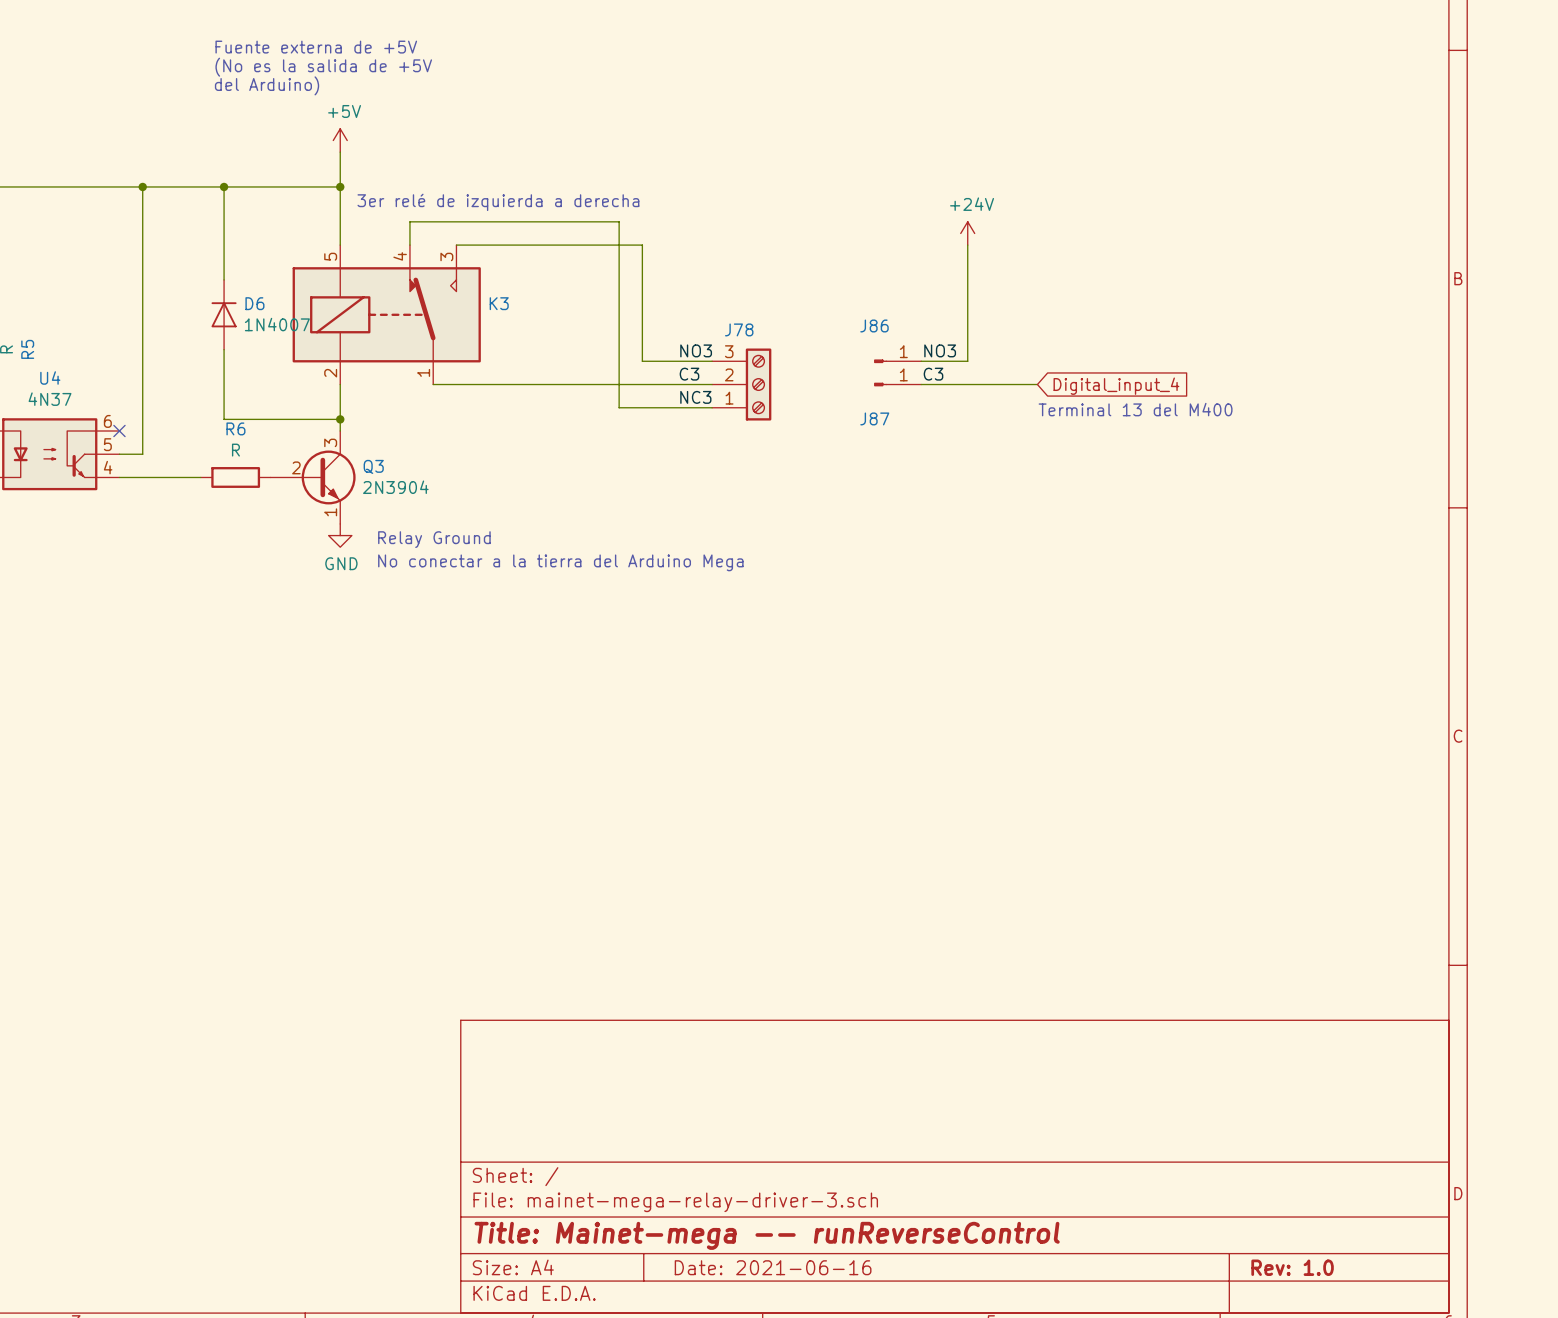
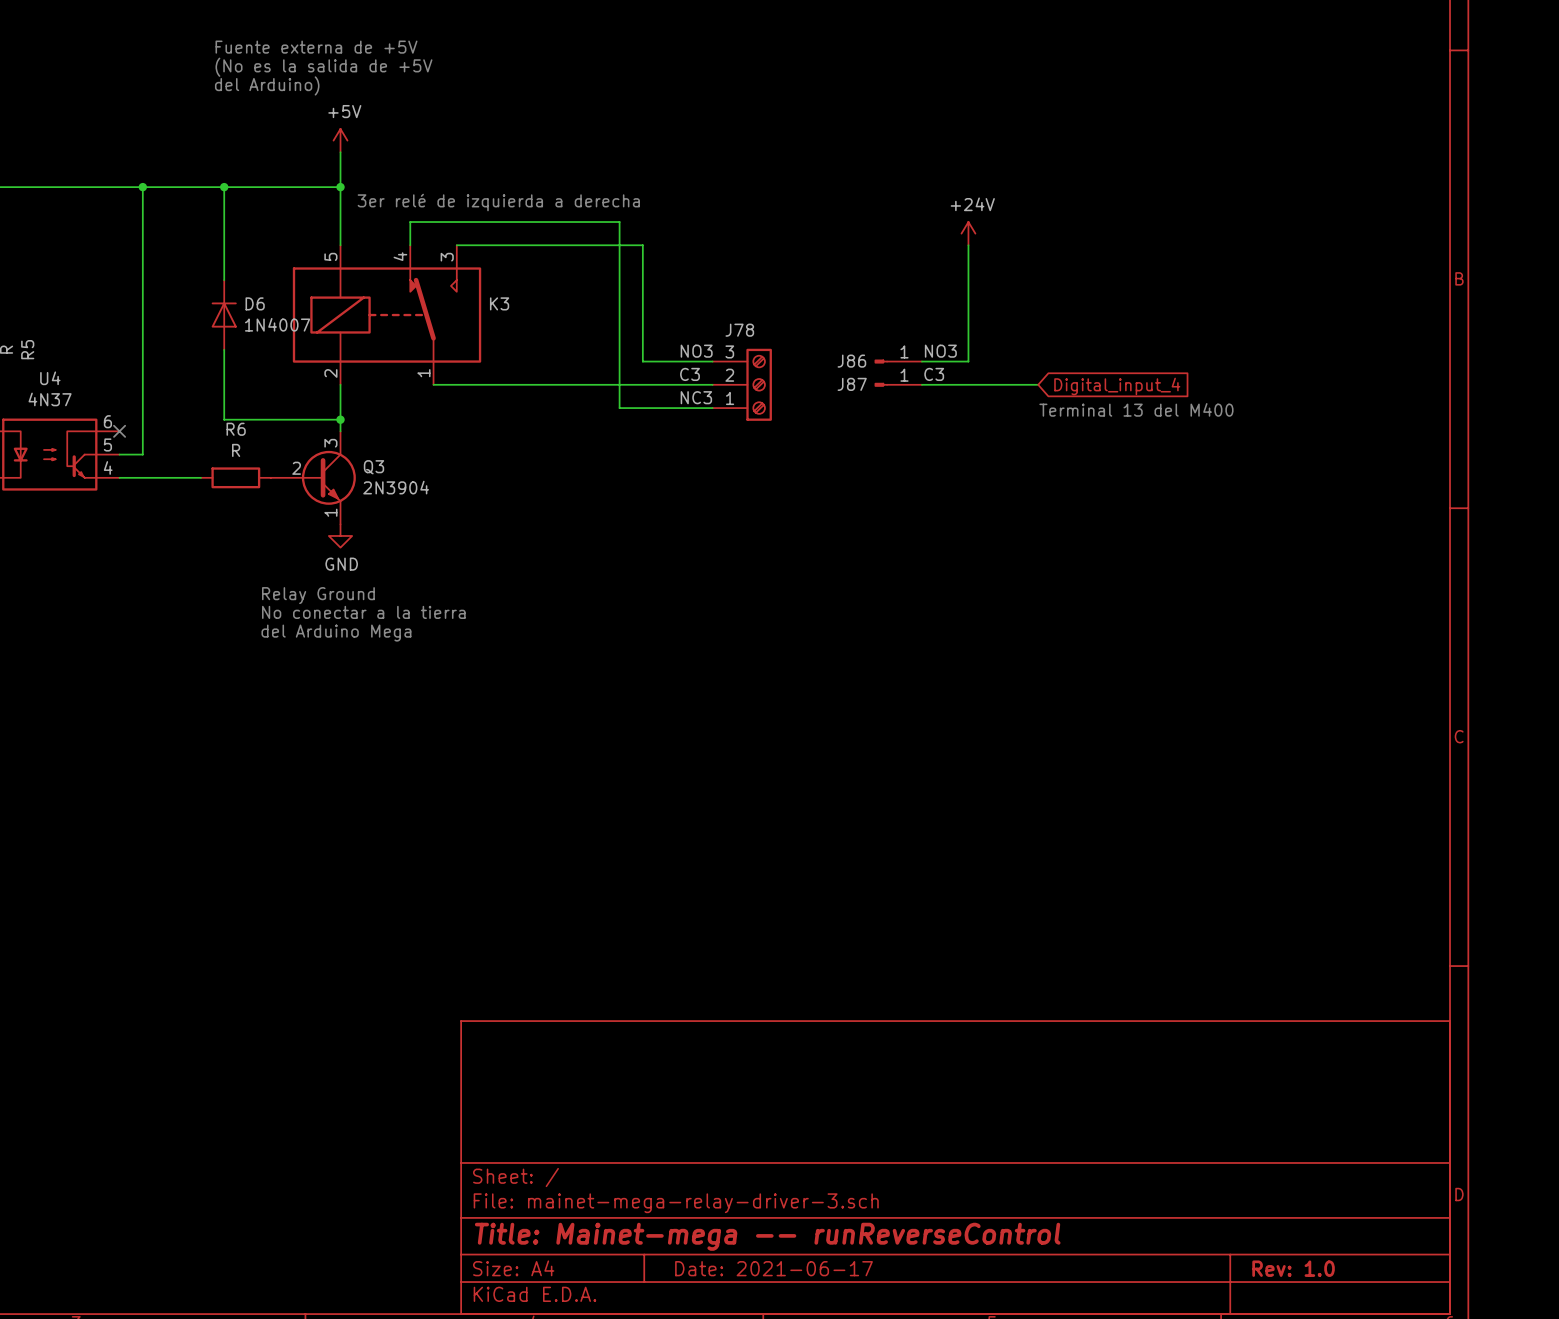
J86 name position: J86 (874, 325) -> J86 (851, 361)
J87 name position: J87 (874, 418) -> J87 (852, 384)
text position: Relay Ground (434, 539) -> Relay Ground (318, 595)
text: No conectar a la tierra del Arduino Mega (560, 562) -> none
text: none -> No conectar a la tierra (363, 612)
text: none -> del Arduino Mega (336, 633)
title block: Date: 2021-06-16 (773, 1267) -> Date: 2021-06-17 (774, 1268)

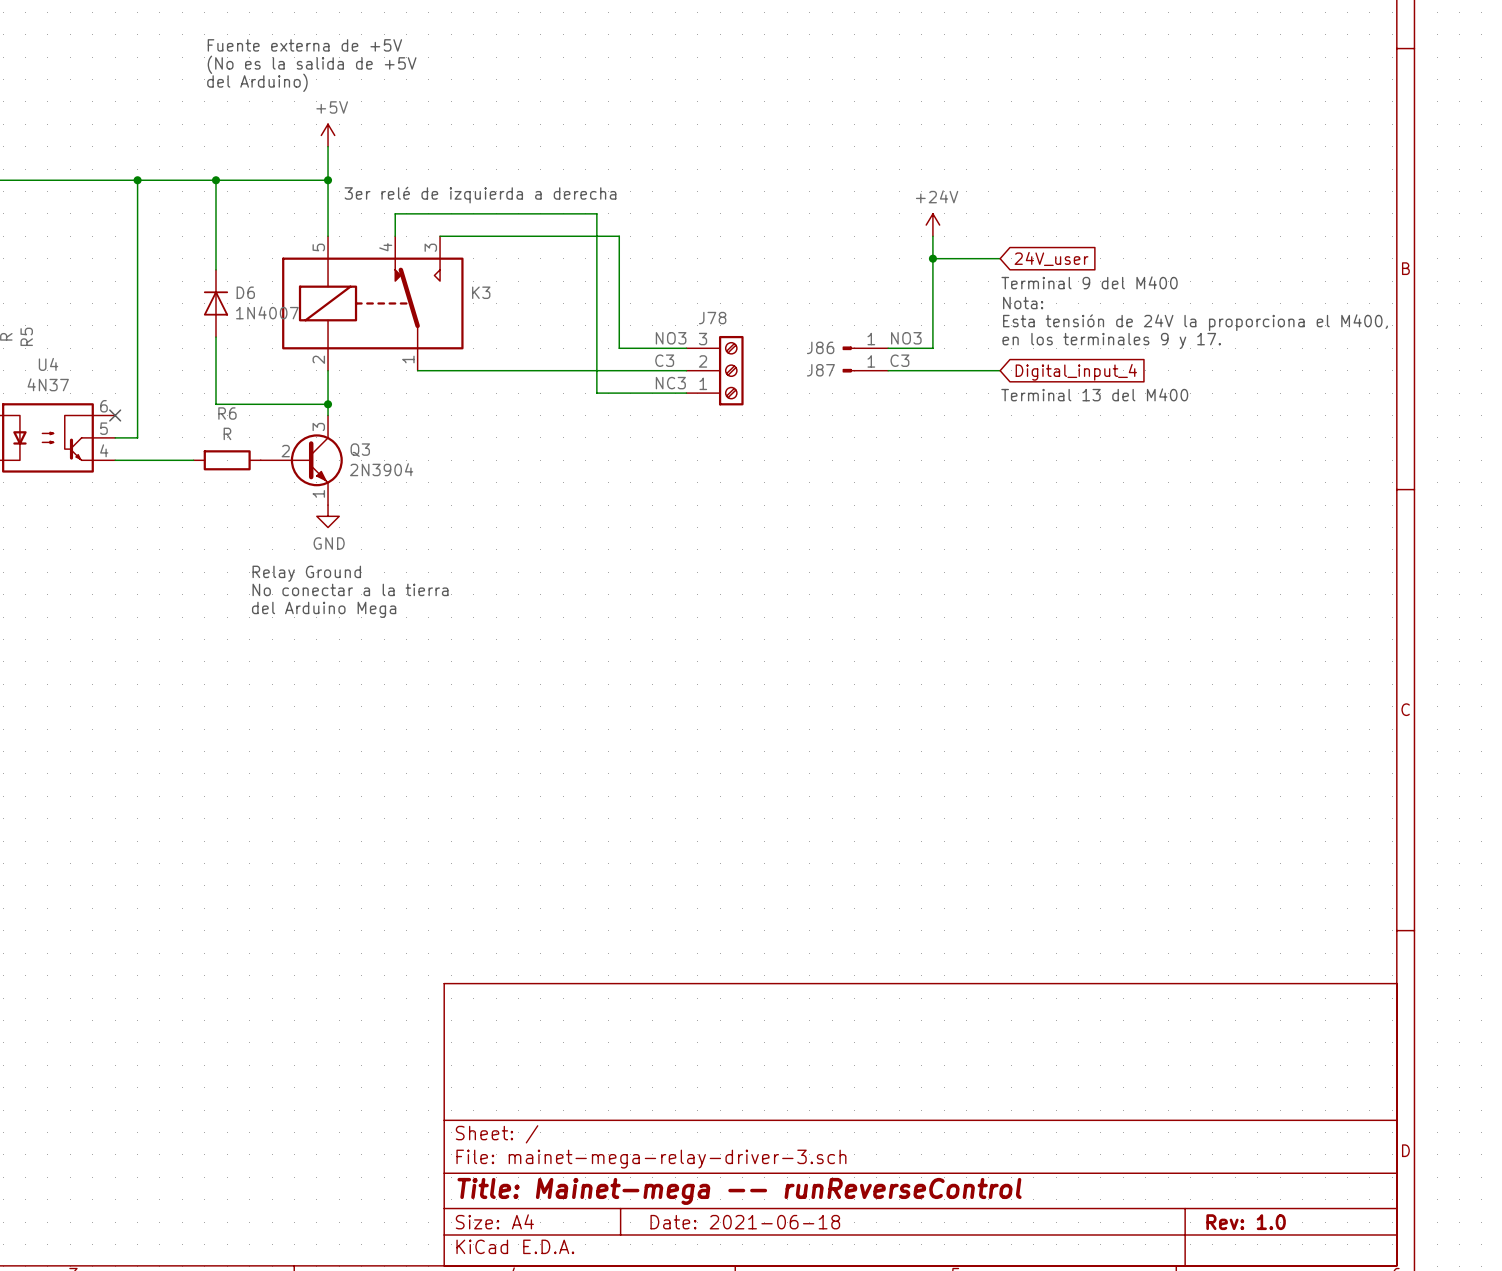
wire: none -> (932, 258) (1000, 258)
junction: none -> (932, 258)
global label: none -> 24V_user (1051, 258)
text: none -> Terminal 9 del M400 (1089, 282)
text: none -> Nota: (1023, 303)
text: none -> Esta tensión de 24V la proporciona el M400, (1195, 322)
text: none -> en los terminales 9 y 17. (1111, 340)
title block: Date: 2021-06-17 (774, 1268) -> Date: 2021-06-18 (745, 1222)

